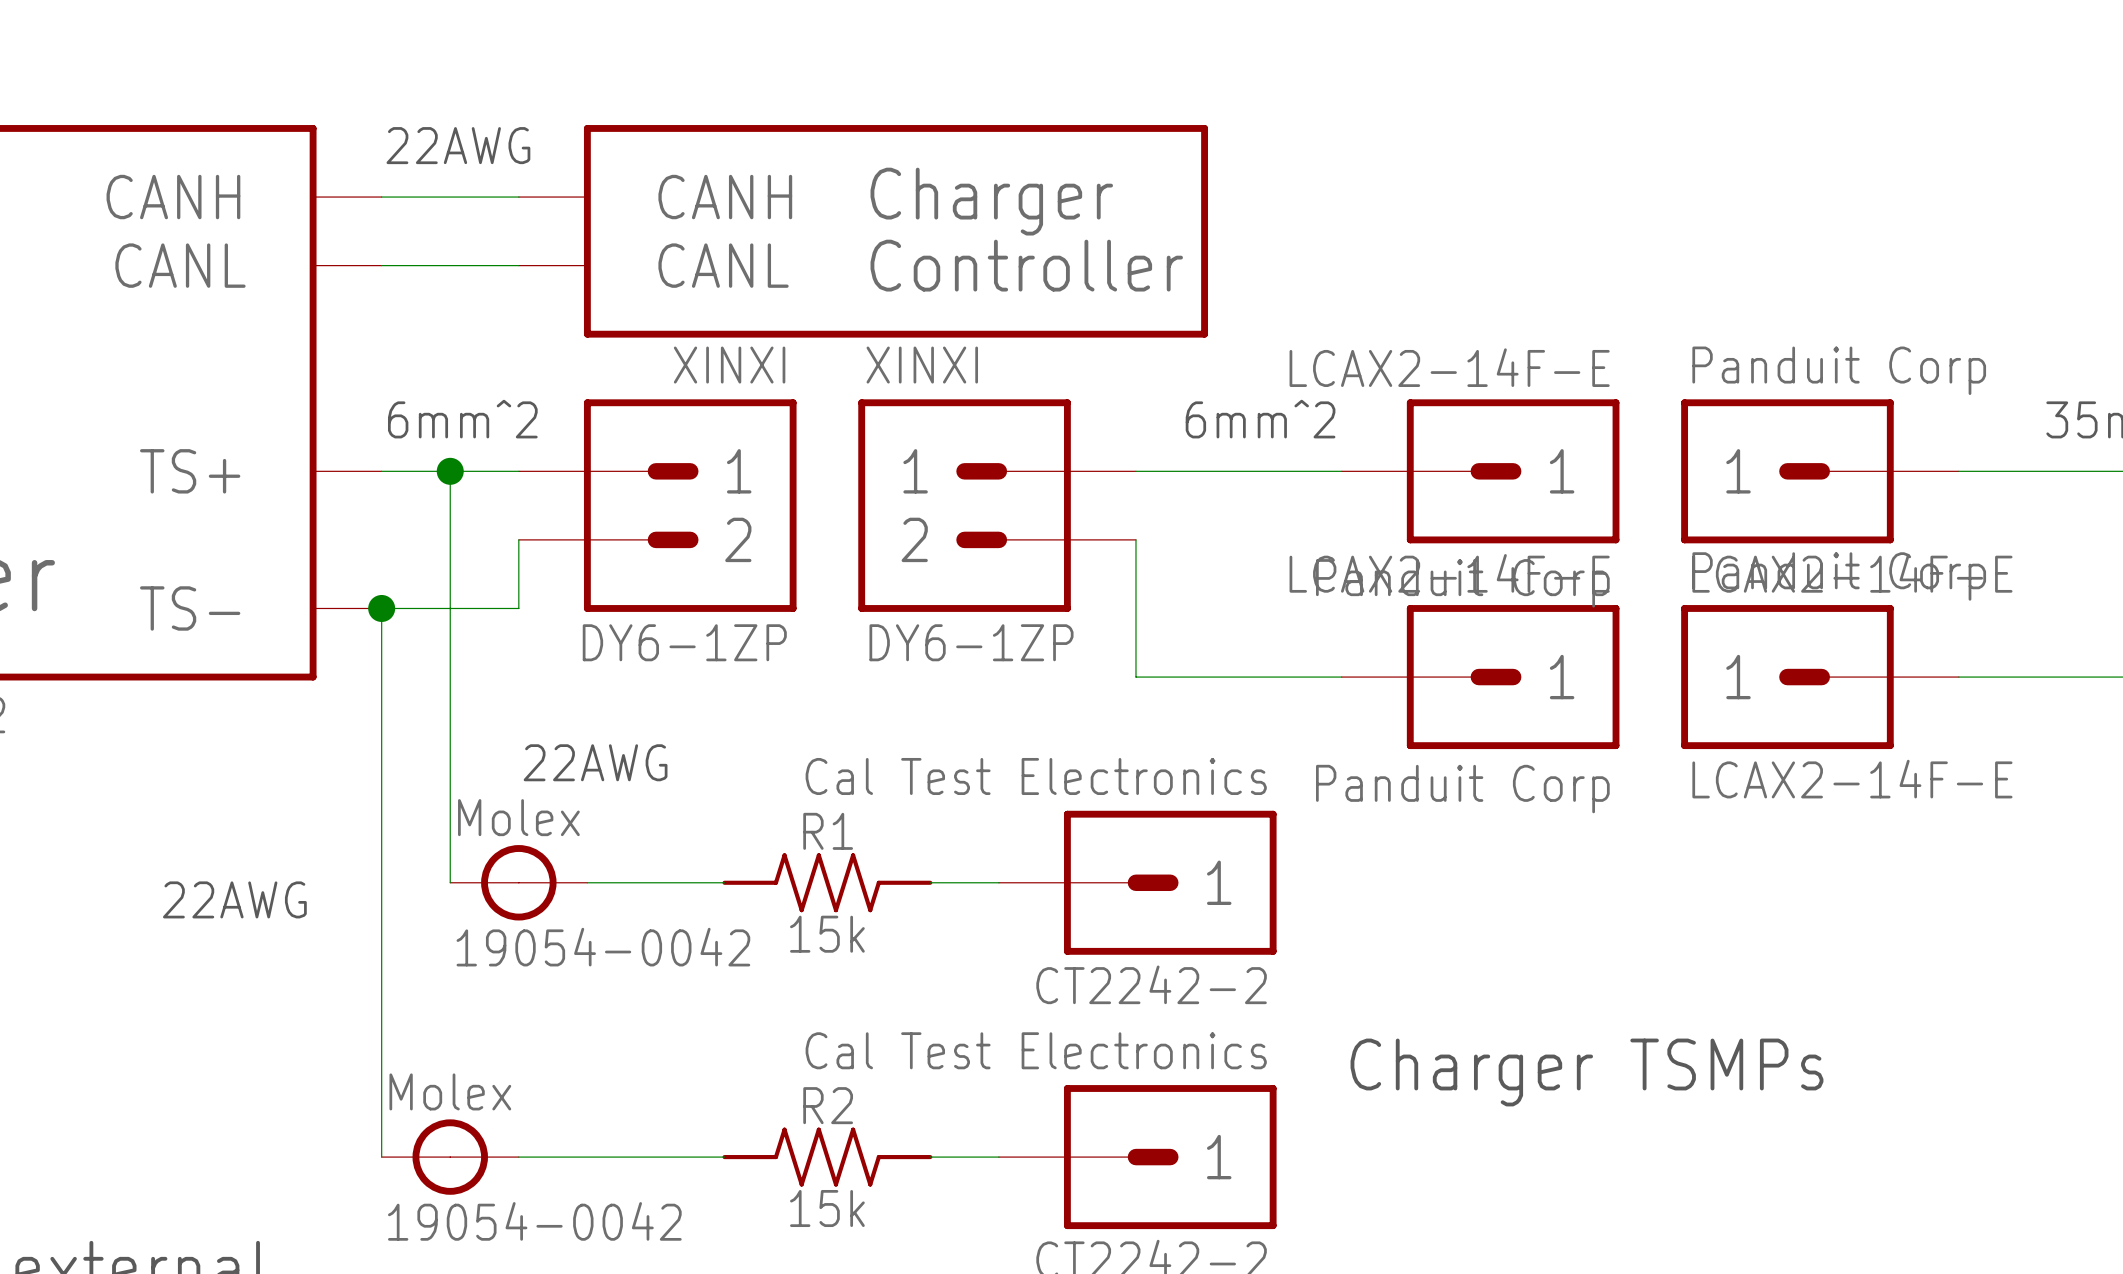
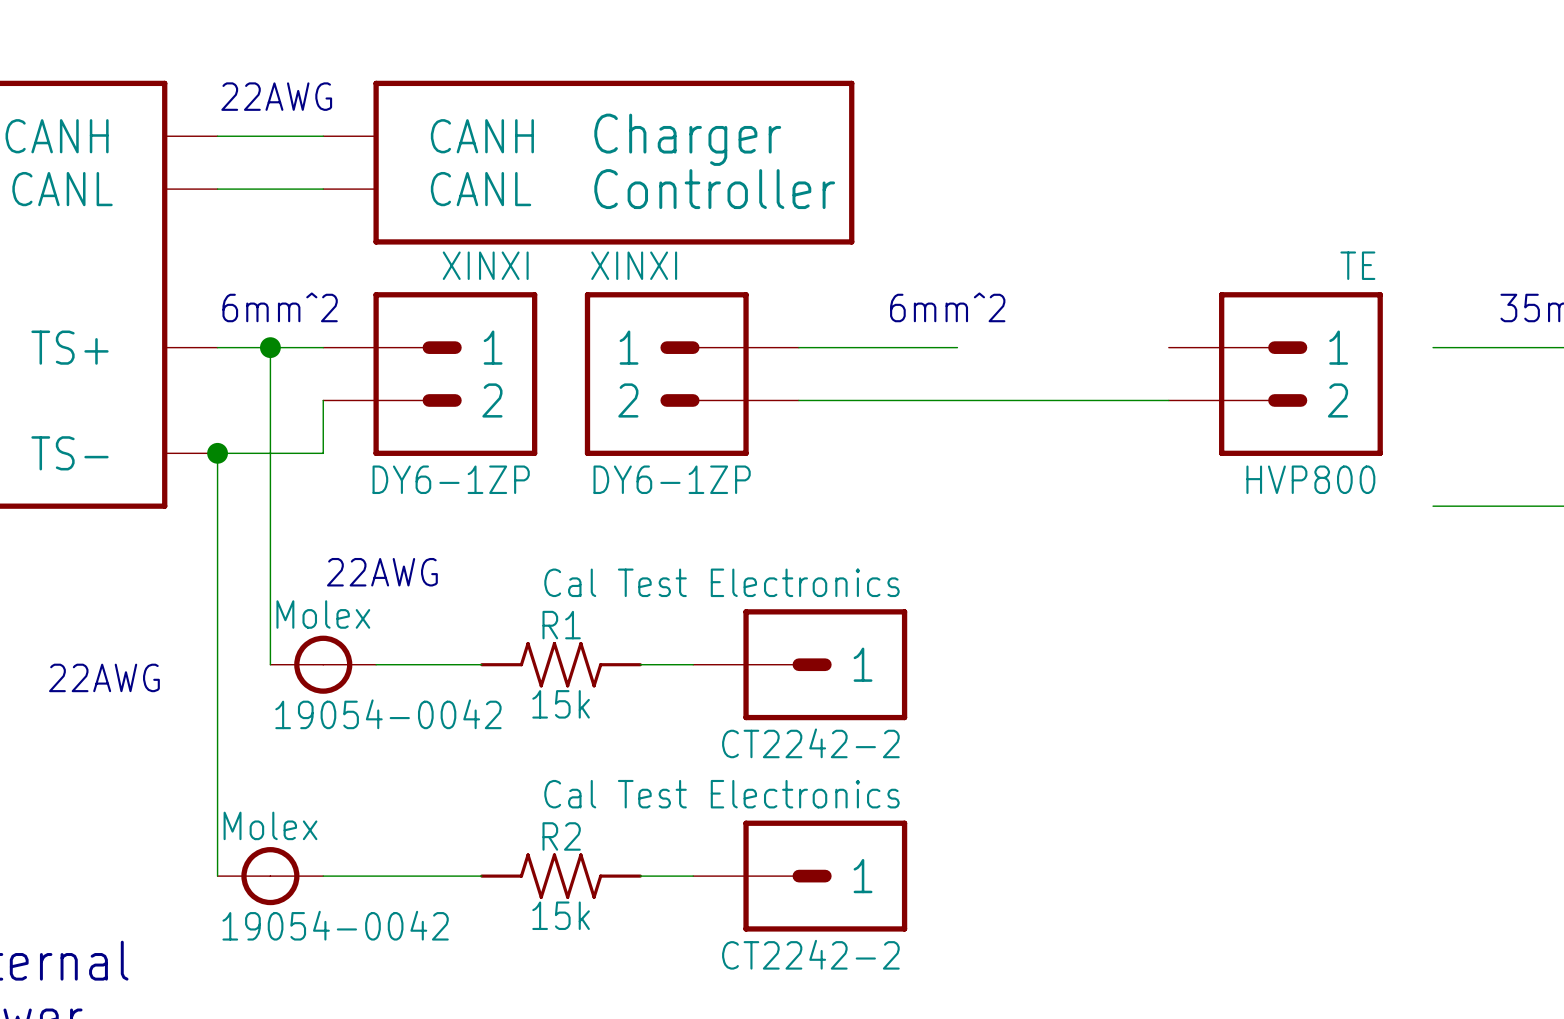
text position: 6mm^2 (1260, 419) -> 6mm^2 (947, 307)
part: (1480, 471) -> none
part: (1820, 471) -> none
part: none -> (1275, 374)
wire: (1135, 539) (1135, 677) (1341, 677) -> (798, 400) (1168, 400)
part: (1480, 677) -> none
part: (1820, 677) -> none
text: Charger TSMPs (1586, 1072) -> none

